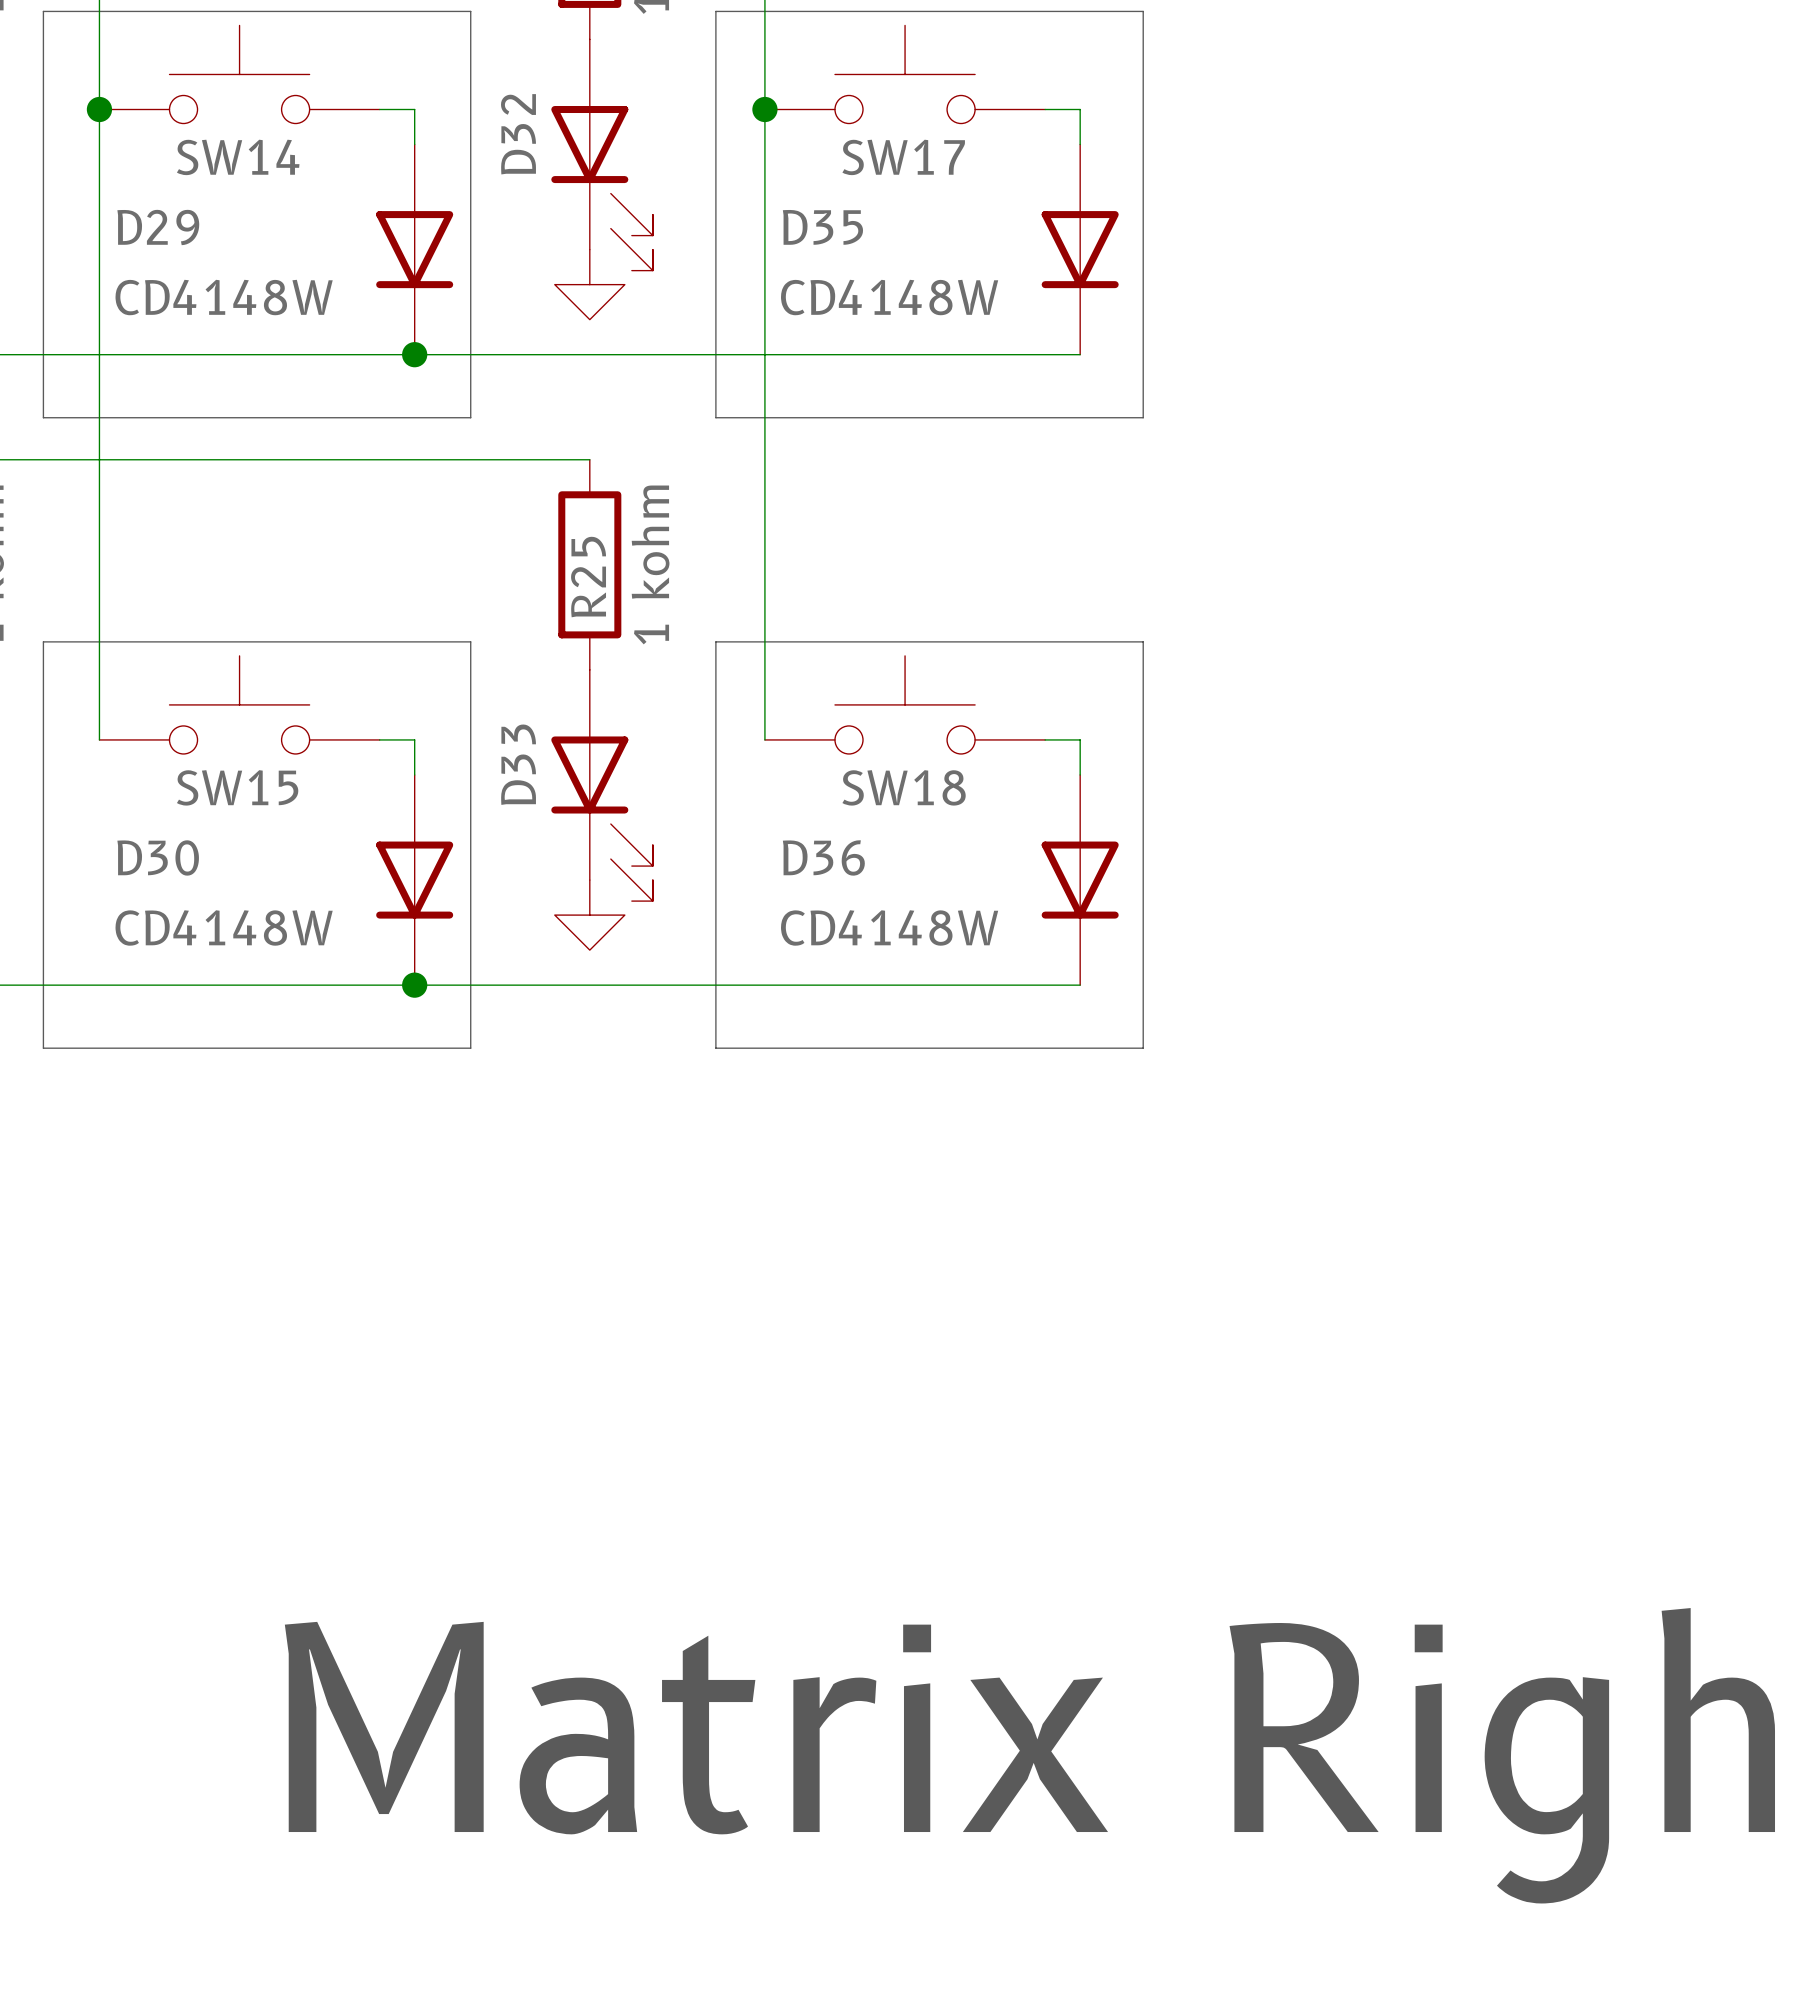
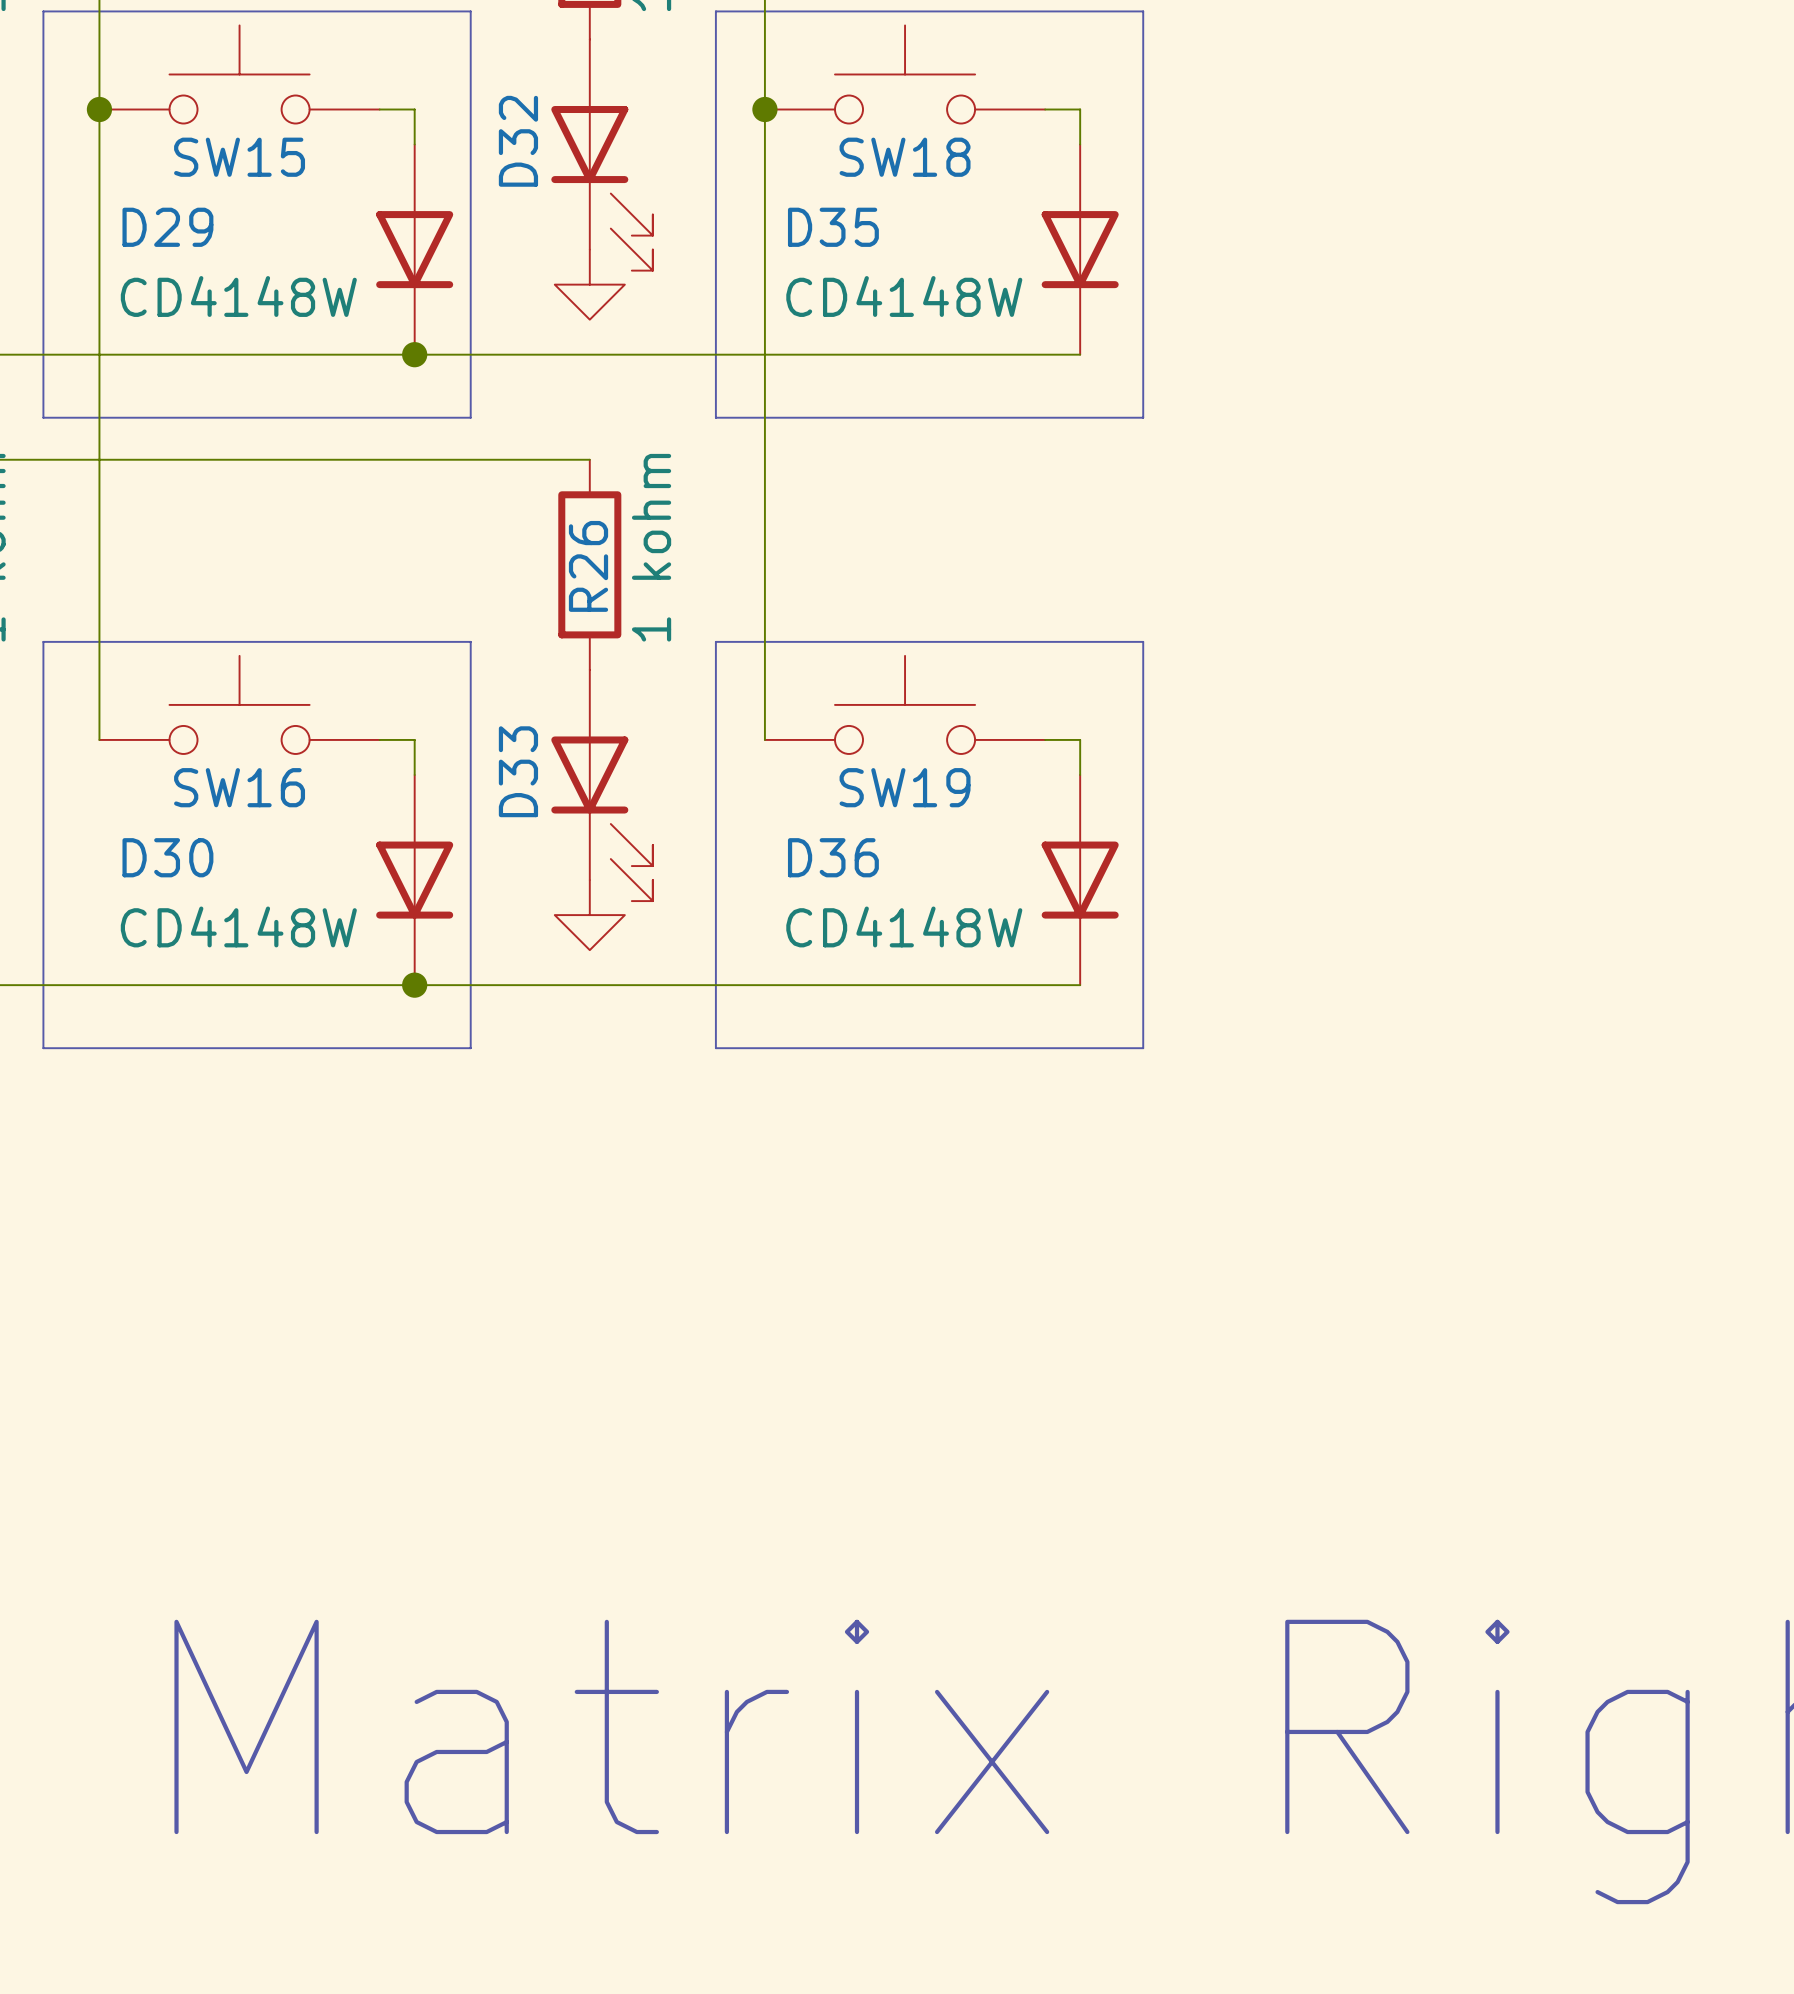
SW14 name: SW14 (238, 157) -> SW15 (239, 157)
SW17 name: SW17 (903, 157) -> SW18 (905, 157)
R25 name: R25 (588, 577) -> R26 (588, 566)
SW15 name: SW15 (237, 787) -> SW16 (239, 787)
SW18 name: SW18 (904, 787) -> SW19 (905, 787)

